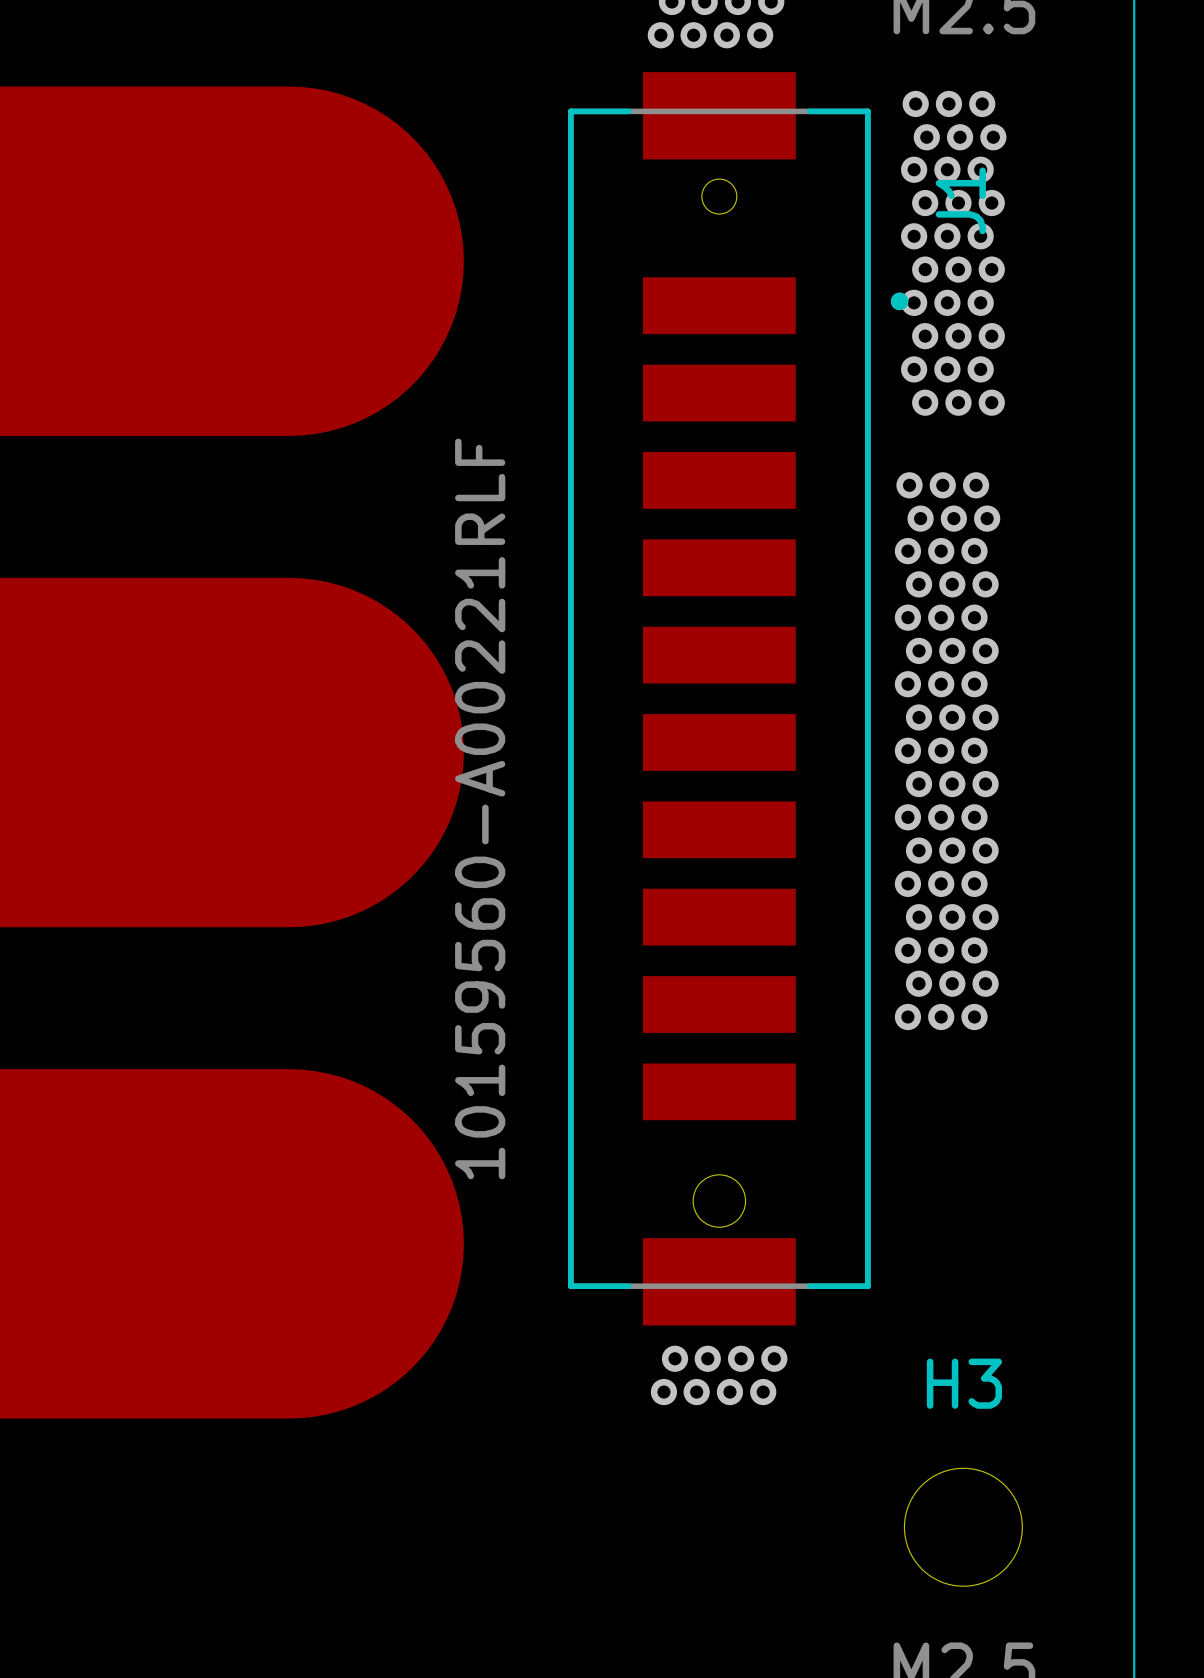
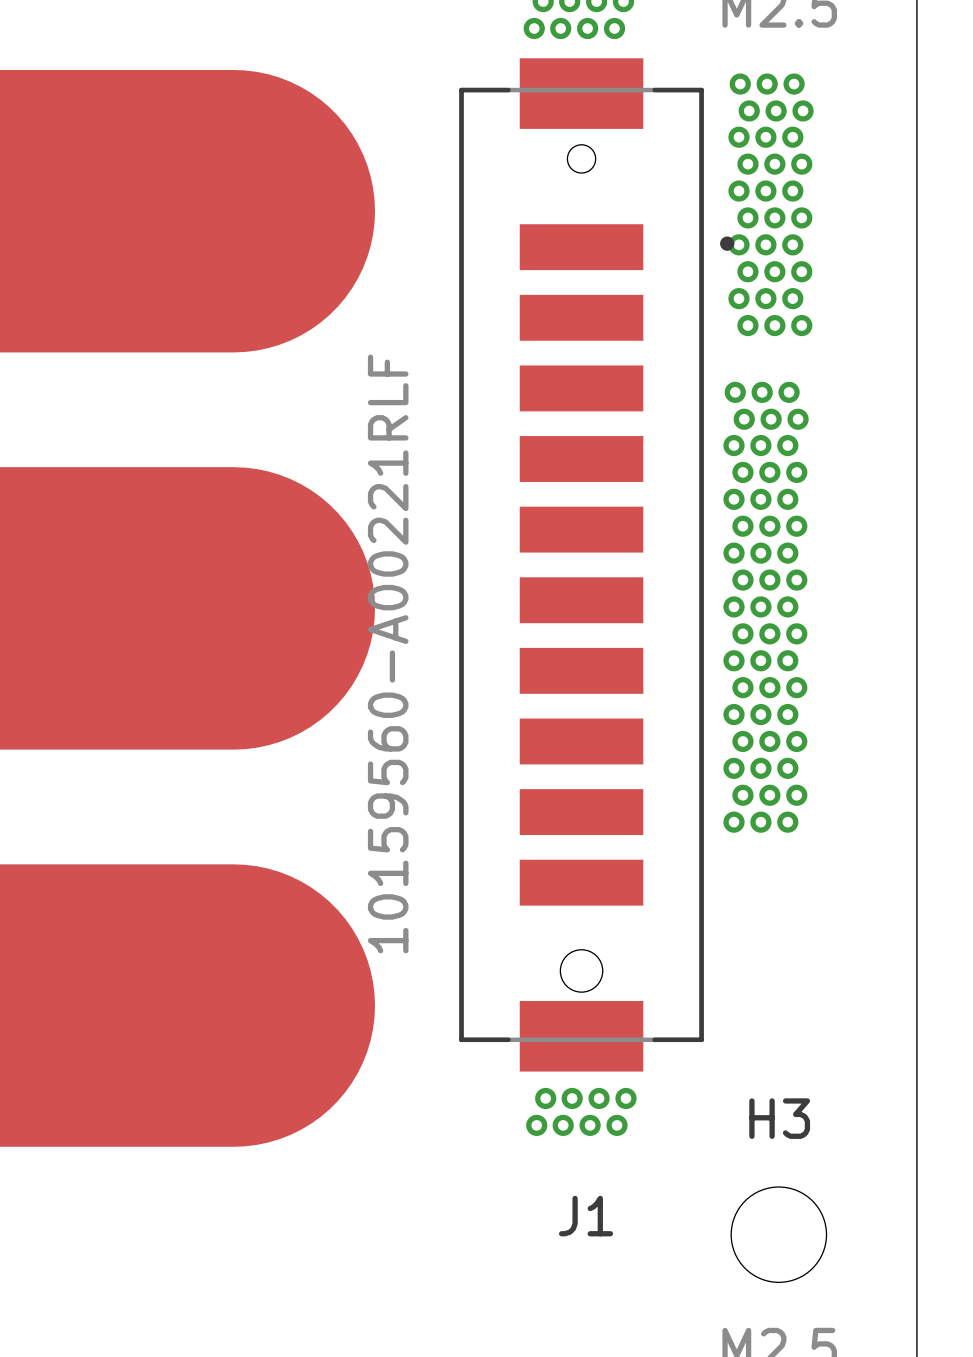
J1 name rotation: 0° (960, 200) -> 90° clockwise (586, 1216)
J1 name position: J1 (960, 200) -> J1 (586, 1216)

